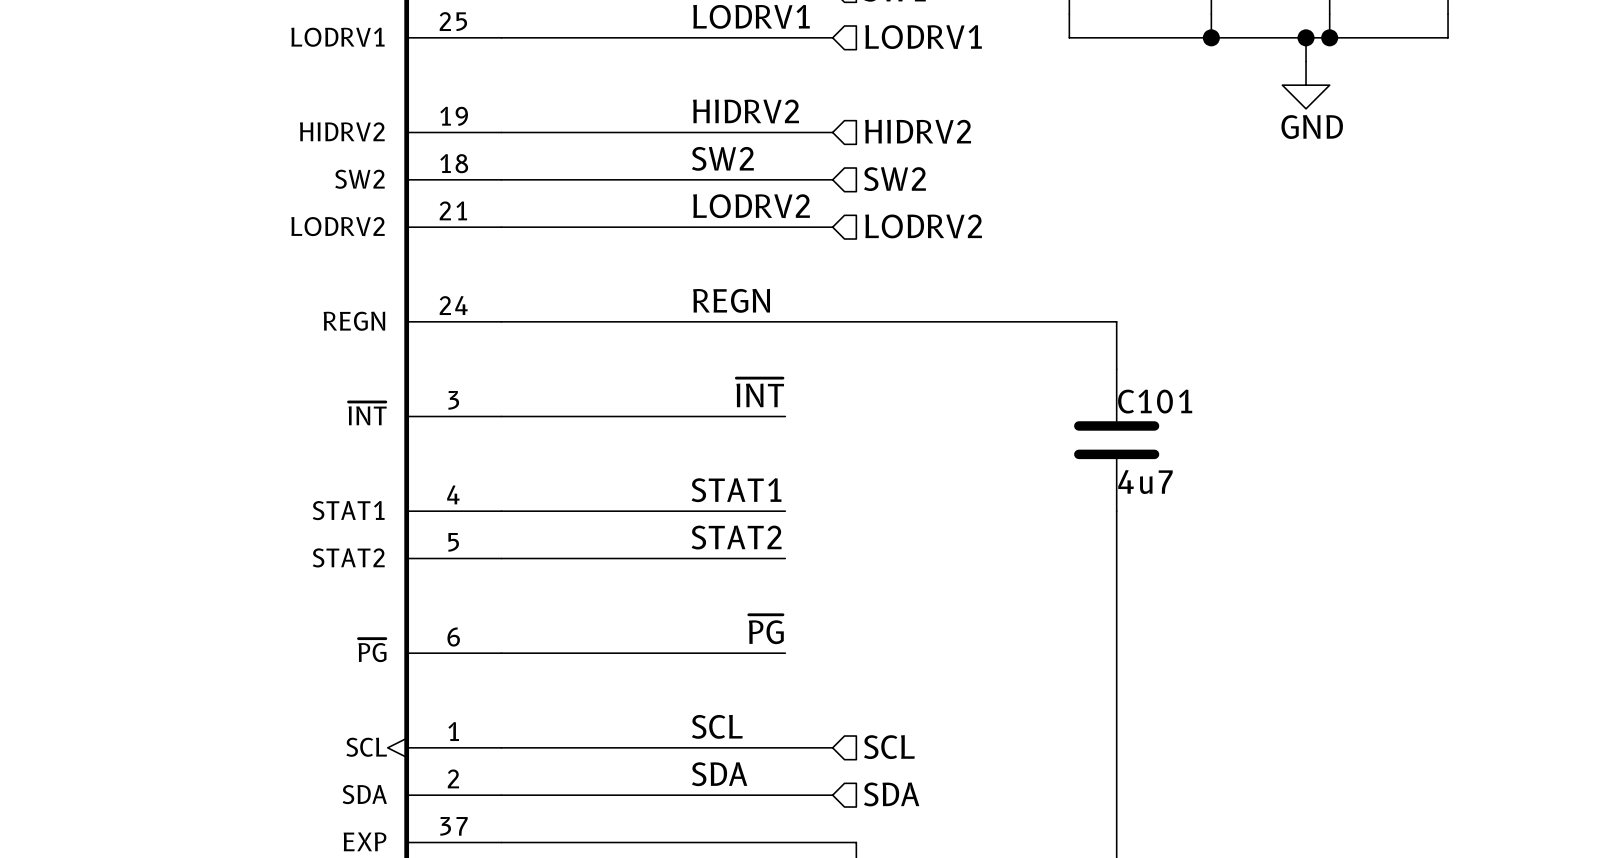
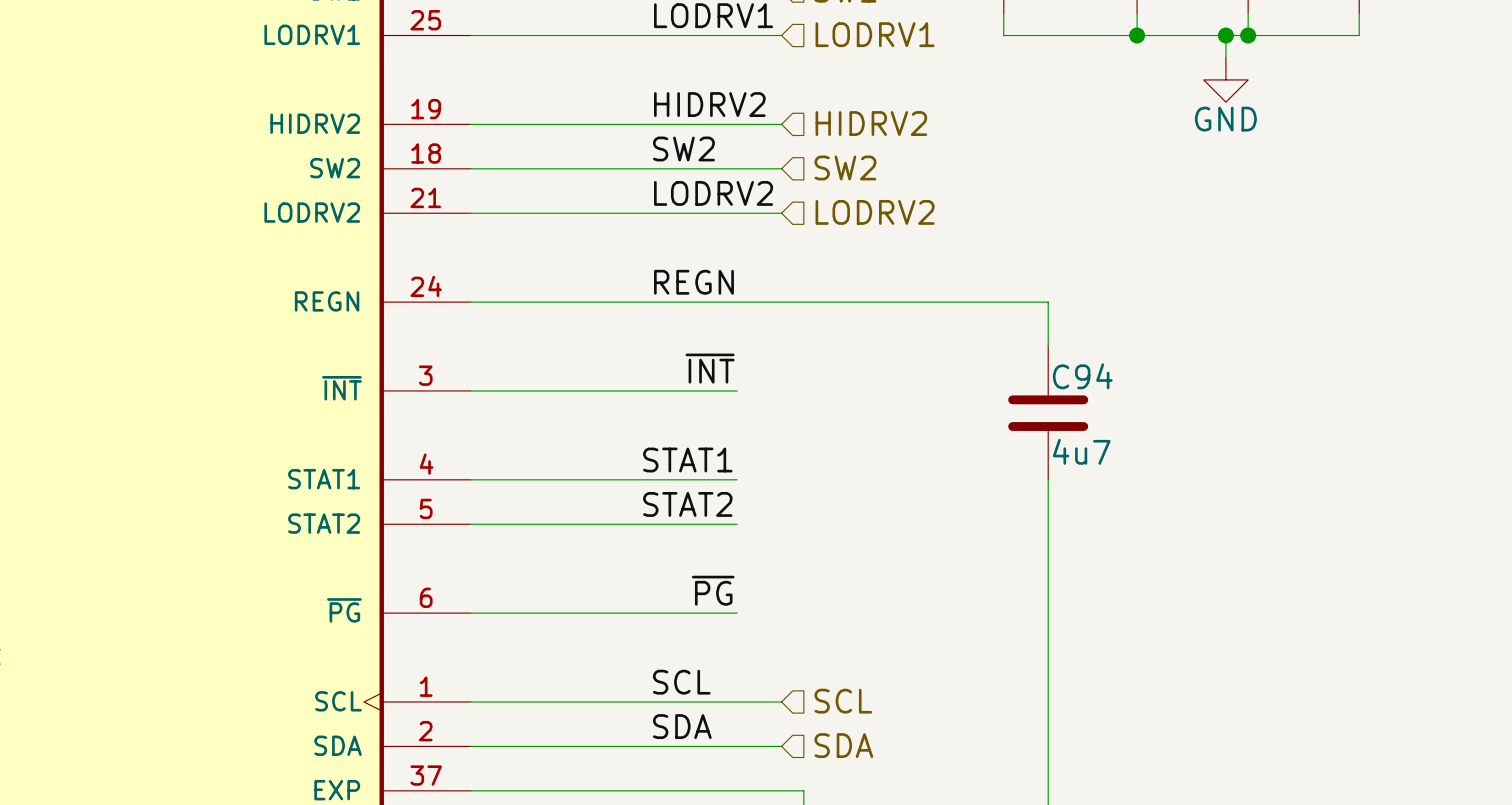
C101 name: C101 (1155, 401) -> C94 (1082, 376)

